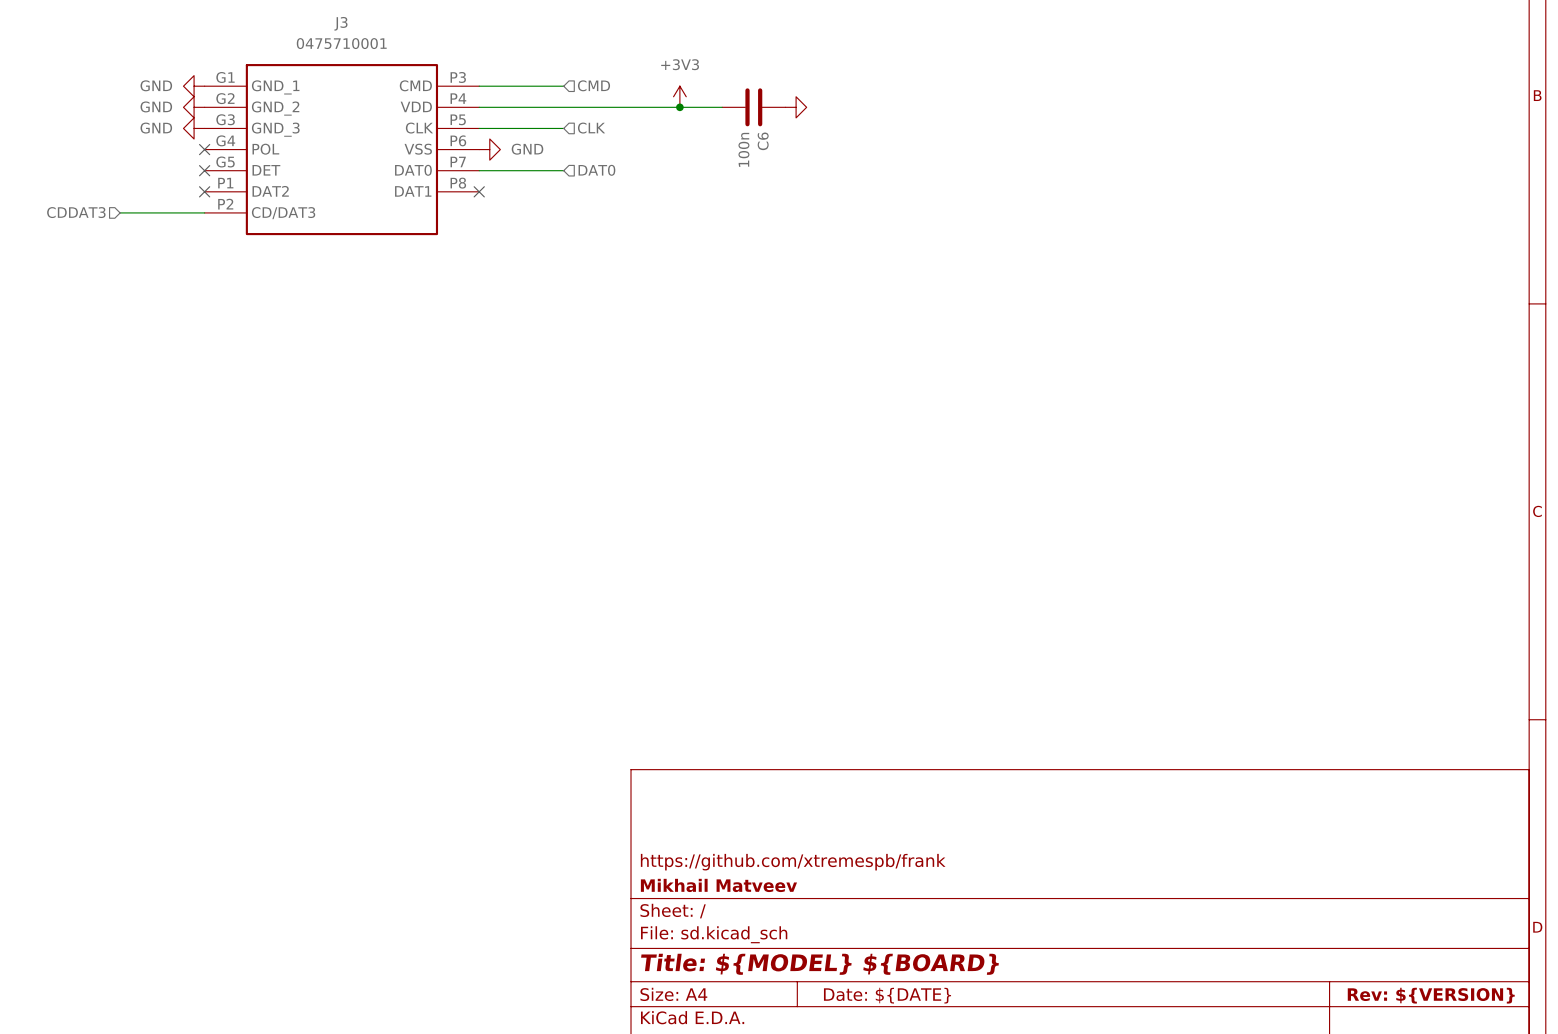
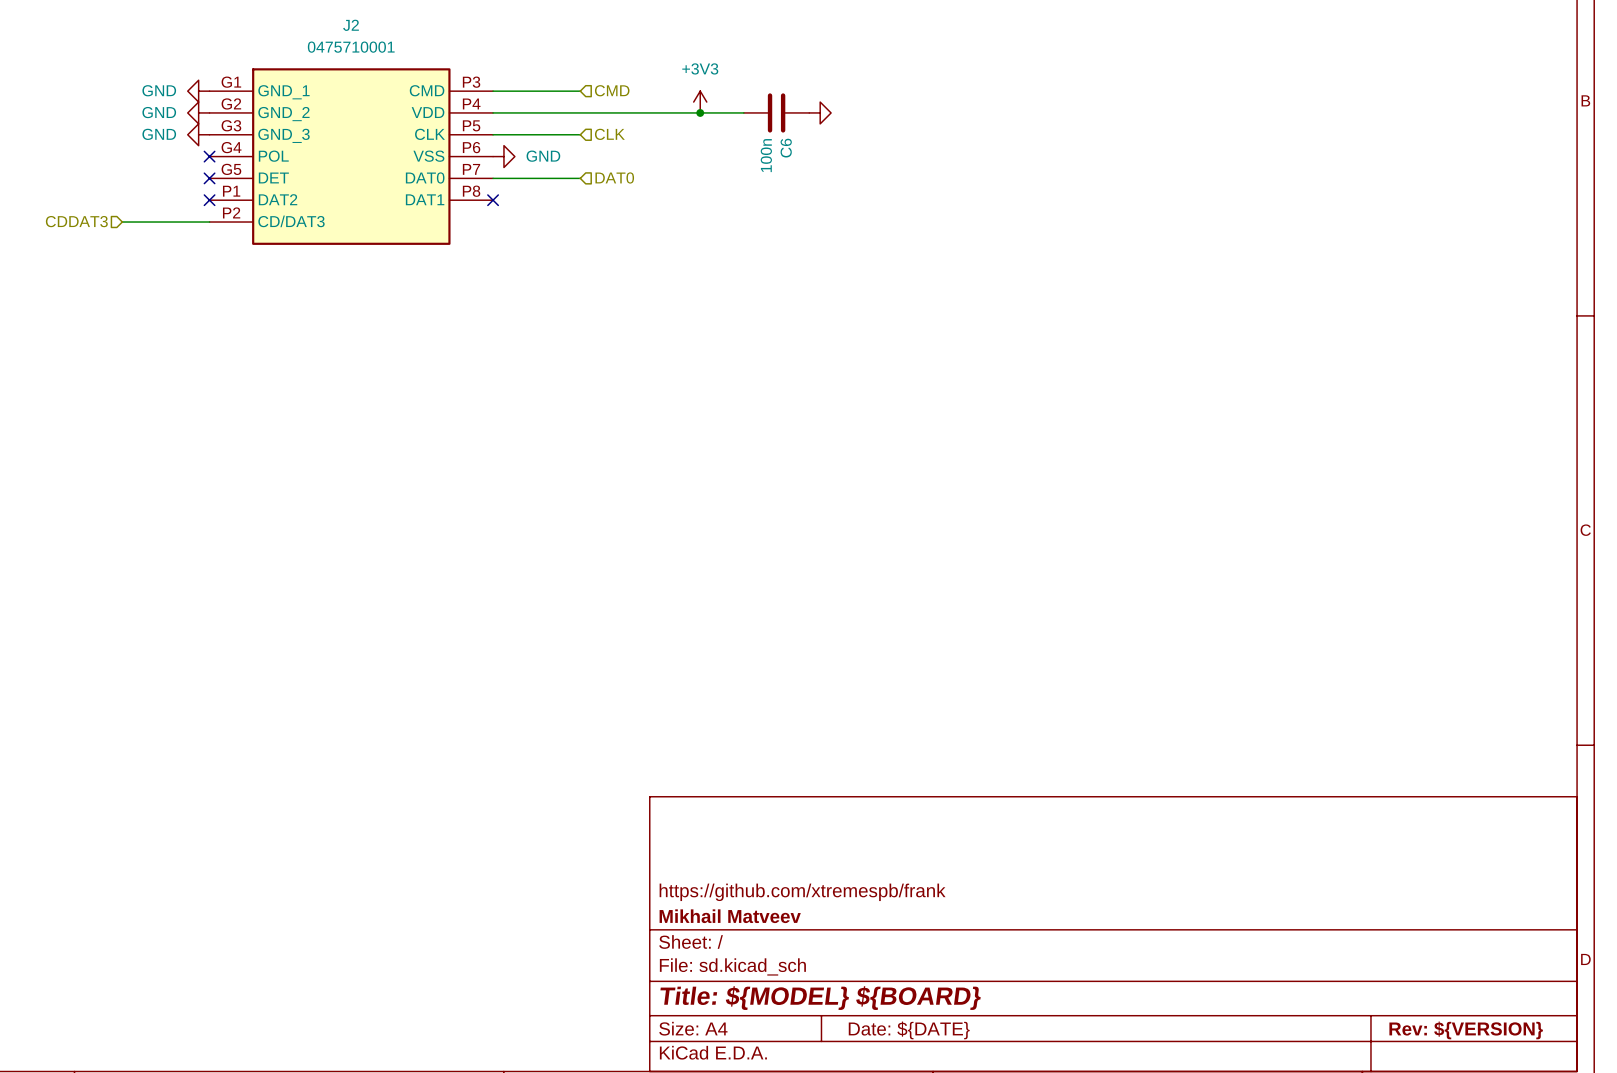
J3 name: J3 (340, 23) -> J2 (351, 25)

